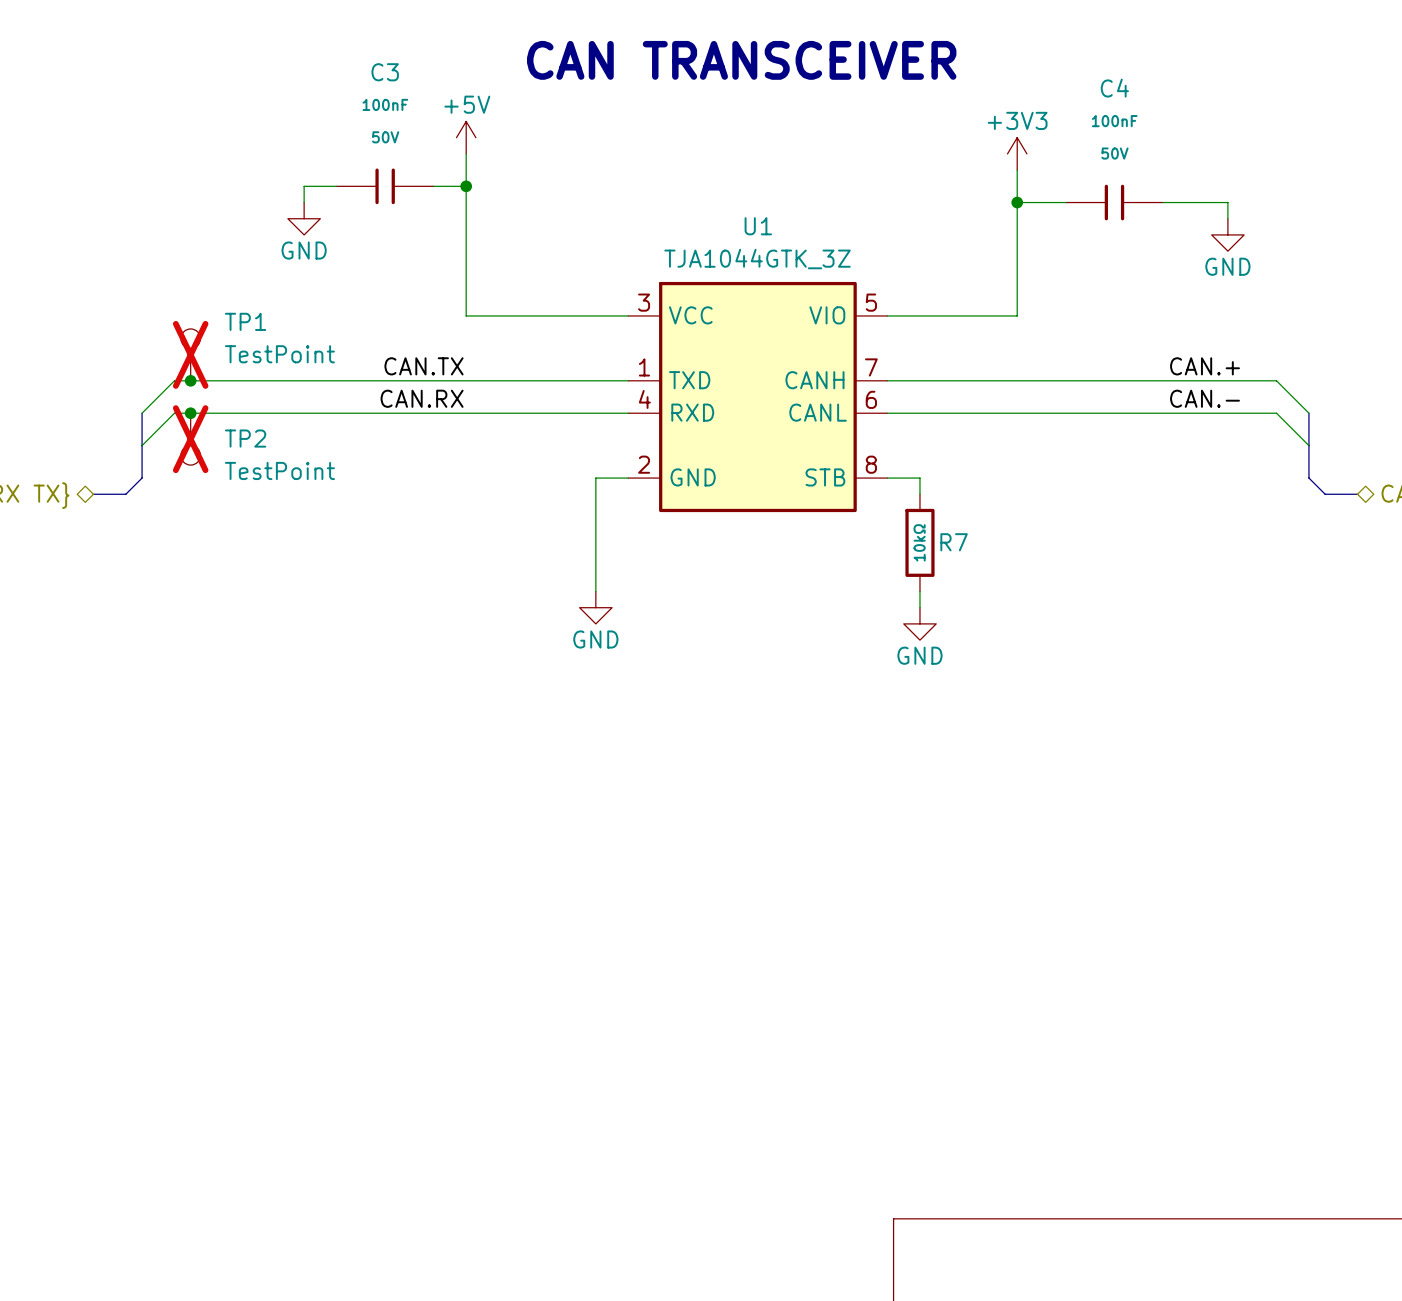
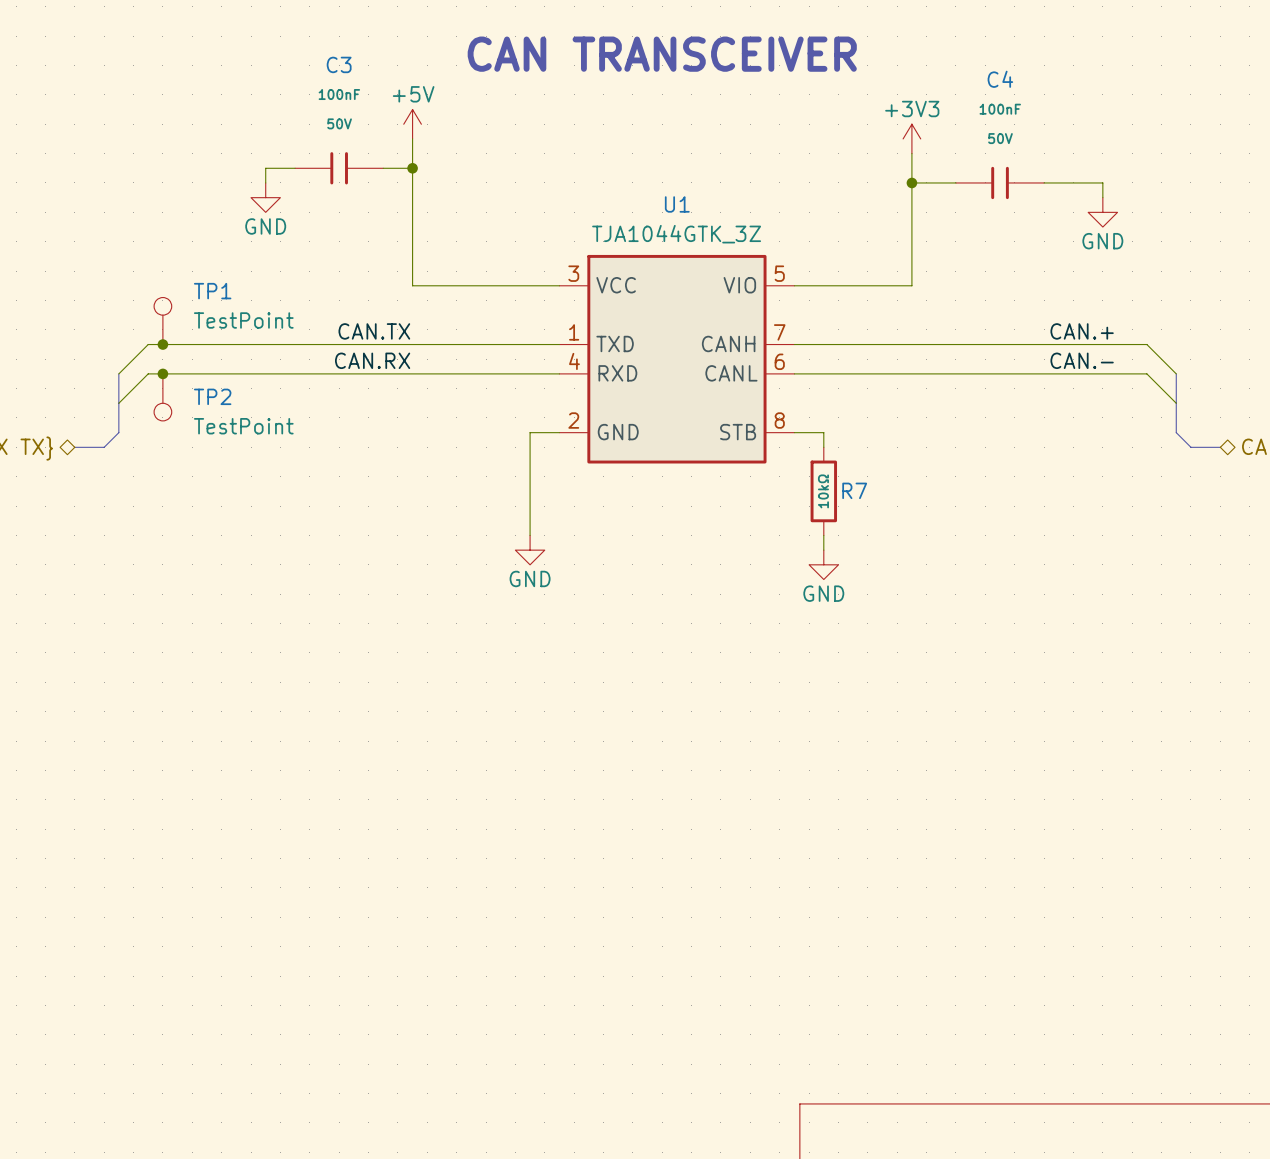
TP1 do-not-place cross: (190, 354) -> none
TP2 do-not-place cross: (190, 439) -> none

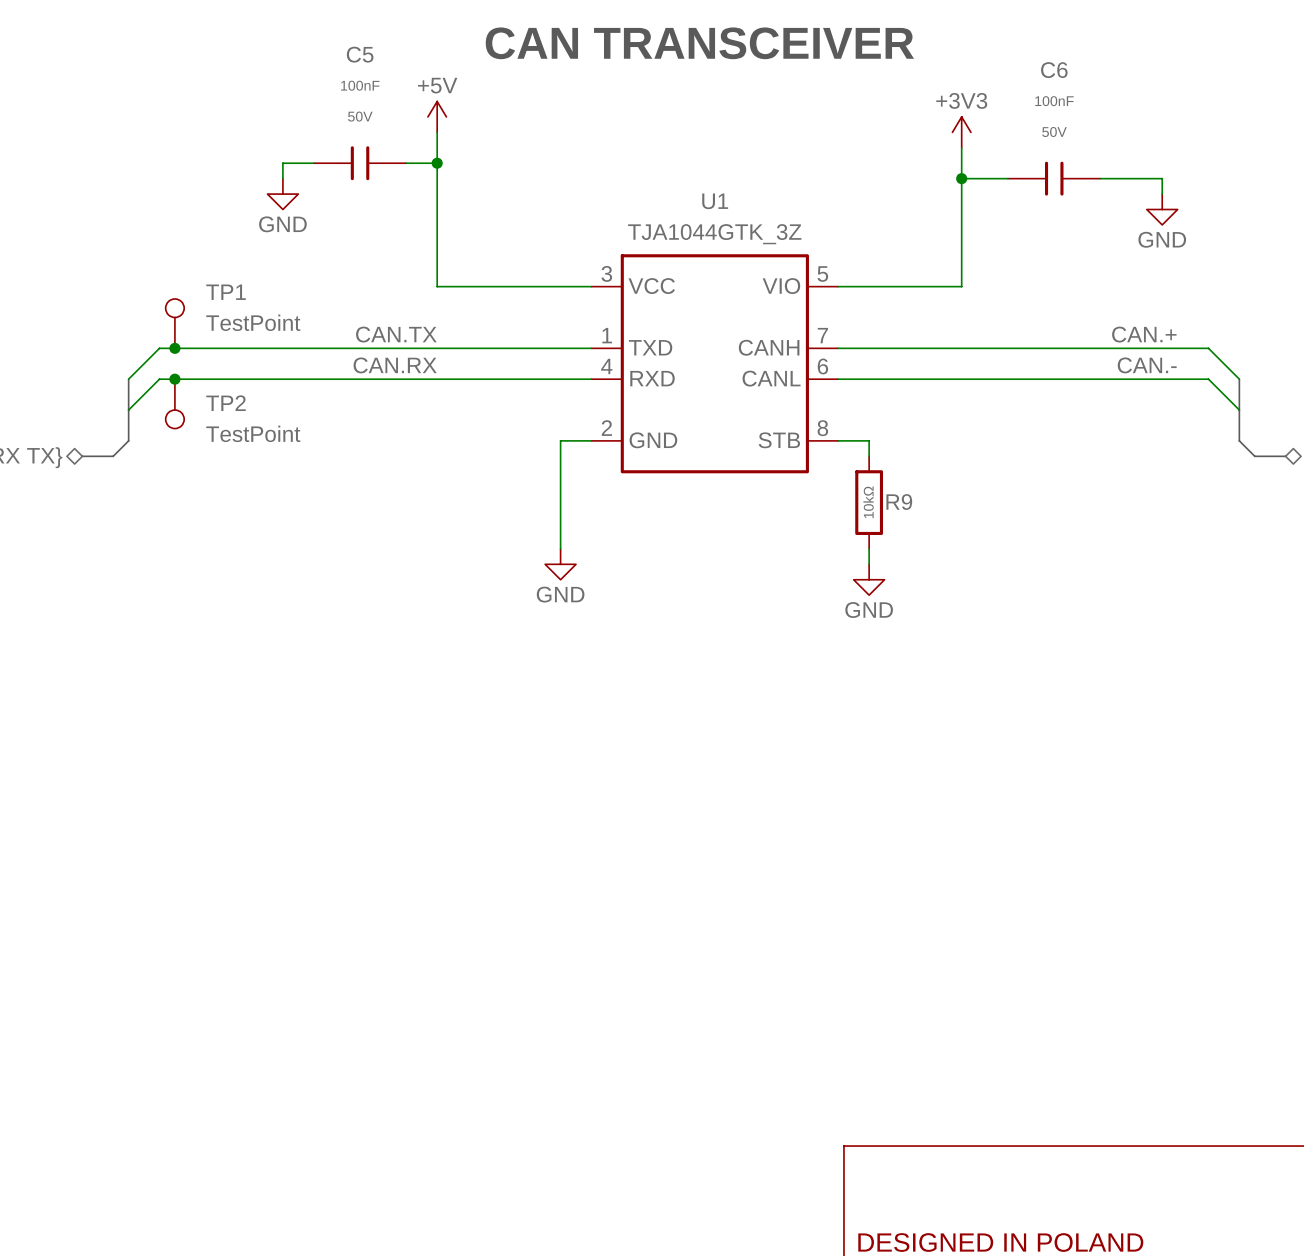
C3 name: C3 (339, 64) -> C5 (360, 54)
C4 name: C4 (1000, 79) -> C6 (1054, 70)
R7 name: R7 (854, 490) -> R9 (899, 502)

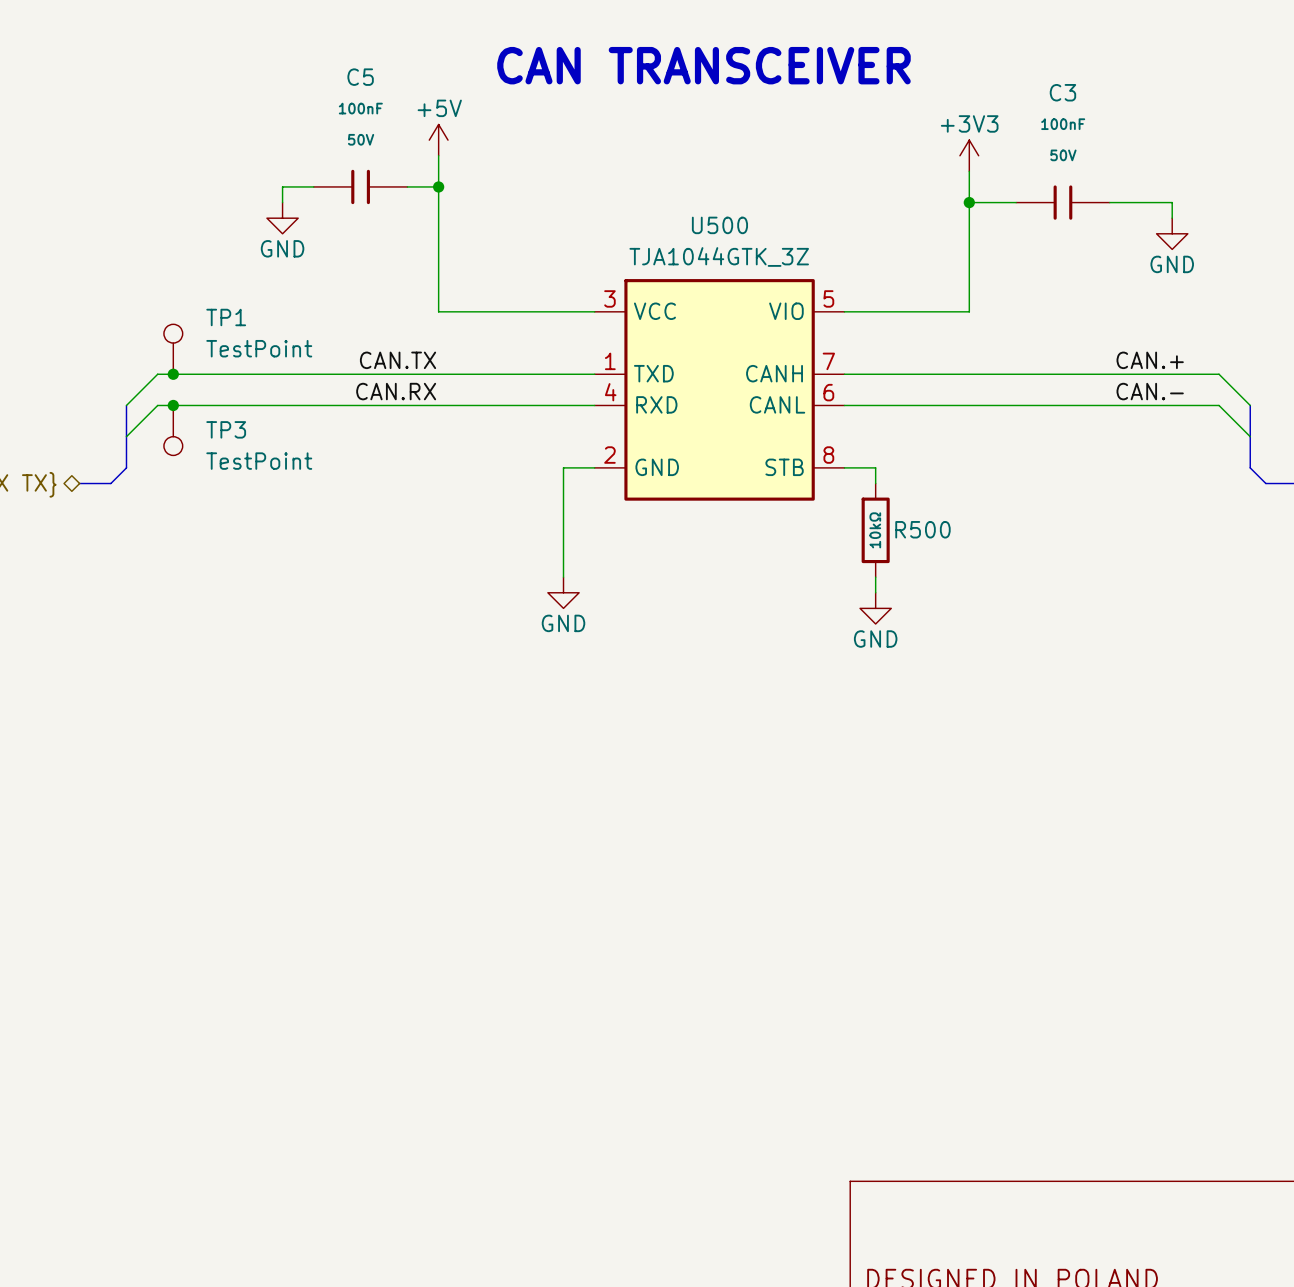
C6 name: C6 (1054, 70) -> C3 (1062, 92)
U1 name: U1 (715, 201) -> U500 (719, 225)
TP2 name: TP2 (226, 403) -> TP3 (226, 429)
R9 name: R9 (899, 502) -> R500 (922, 529)

